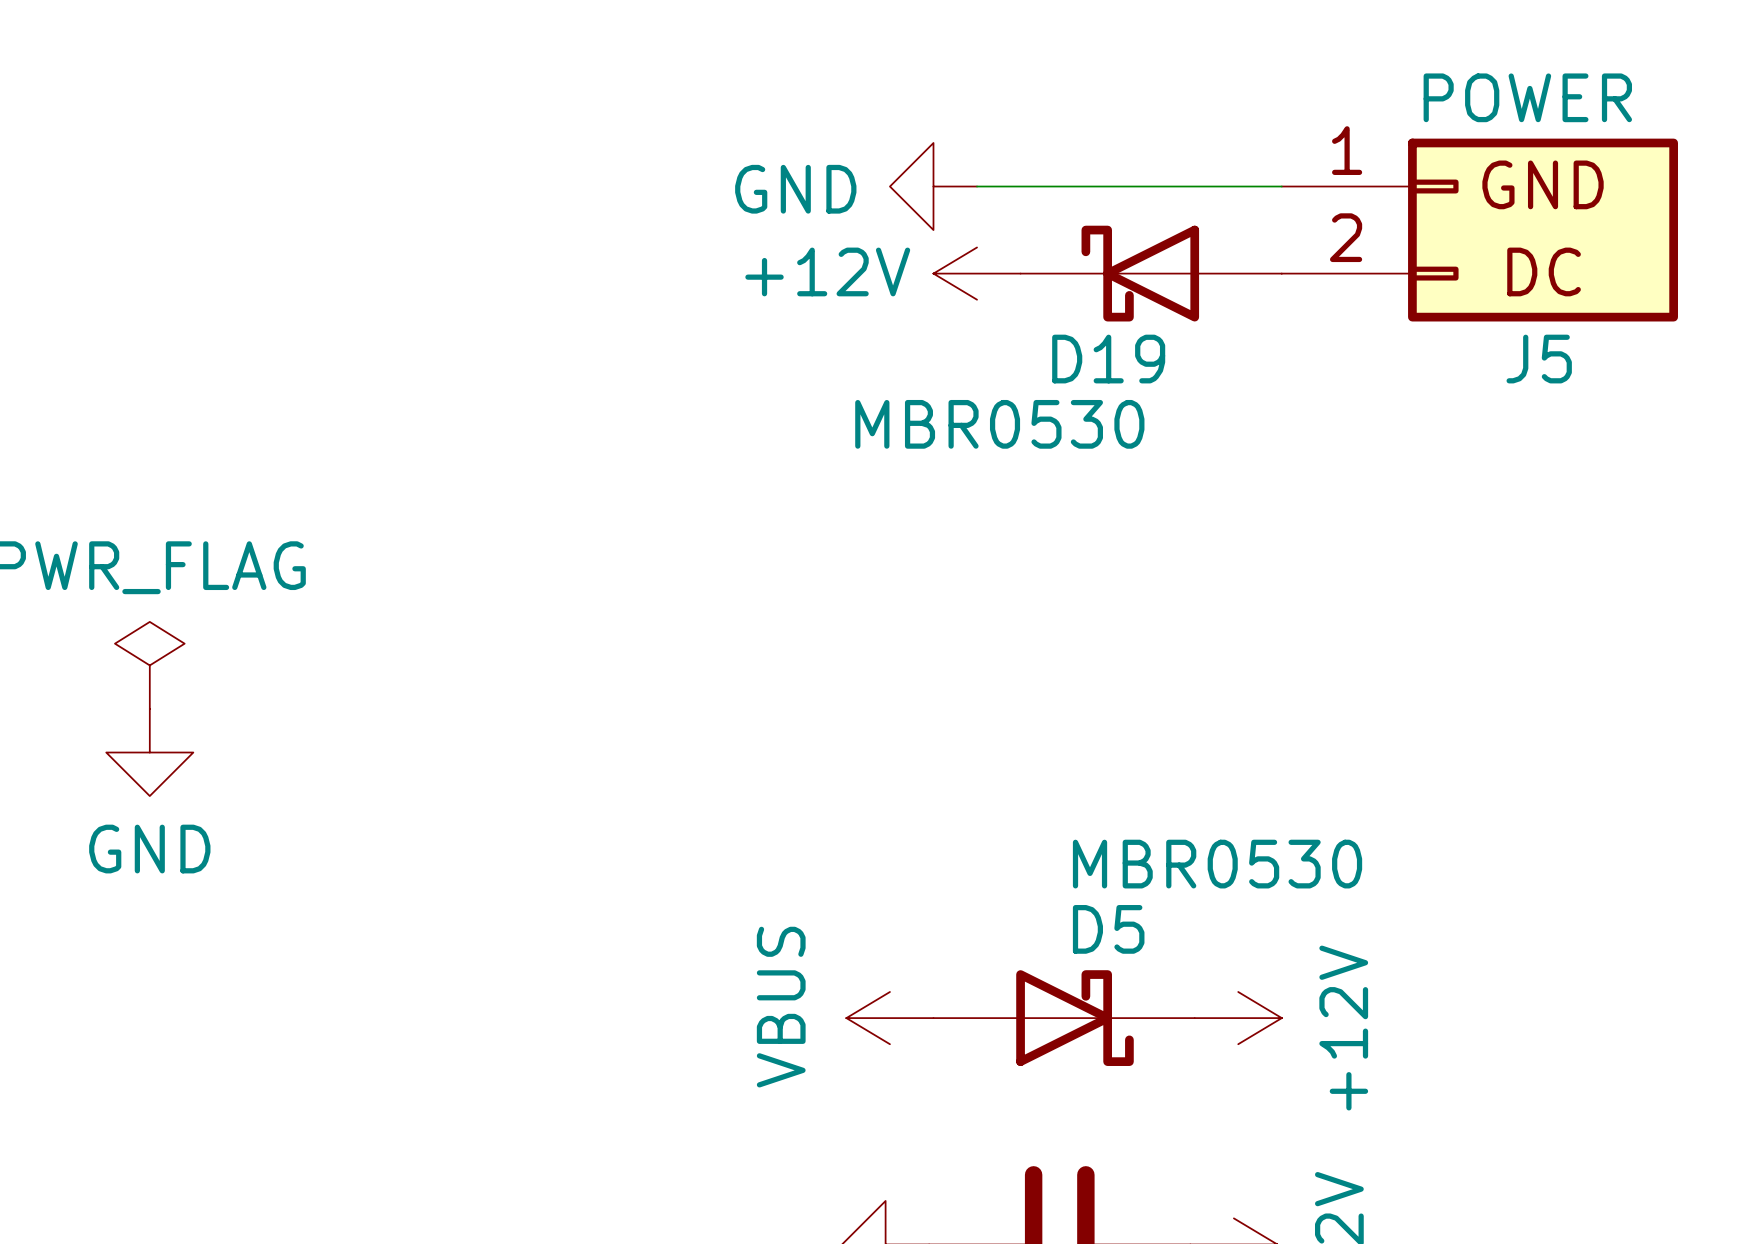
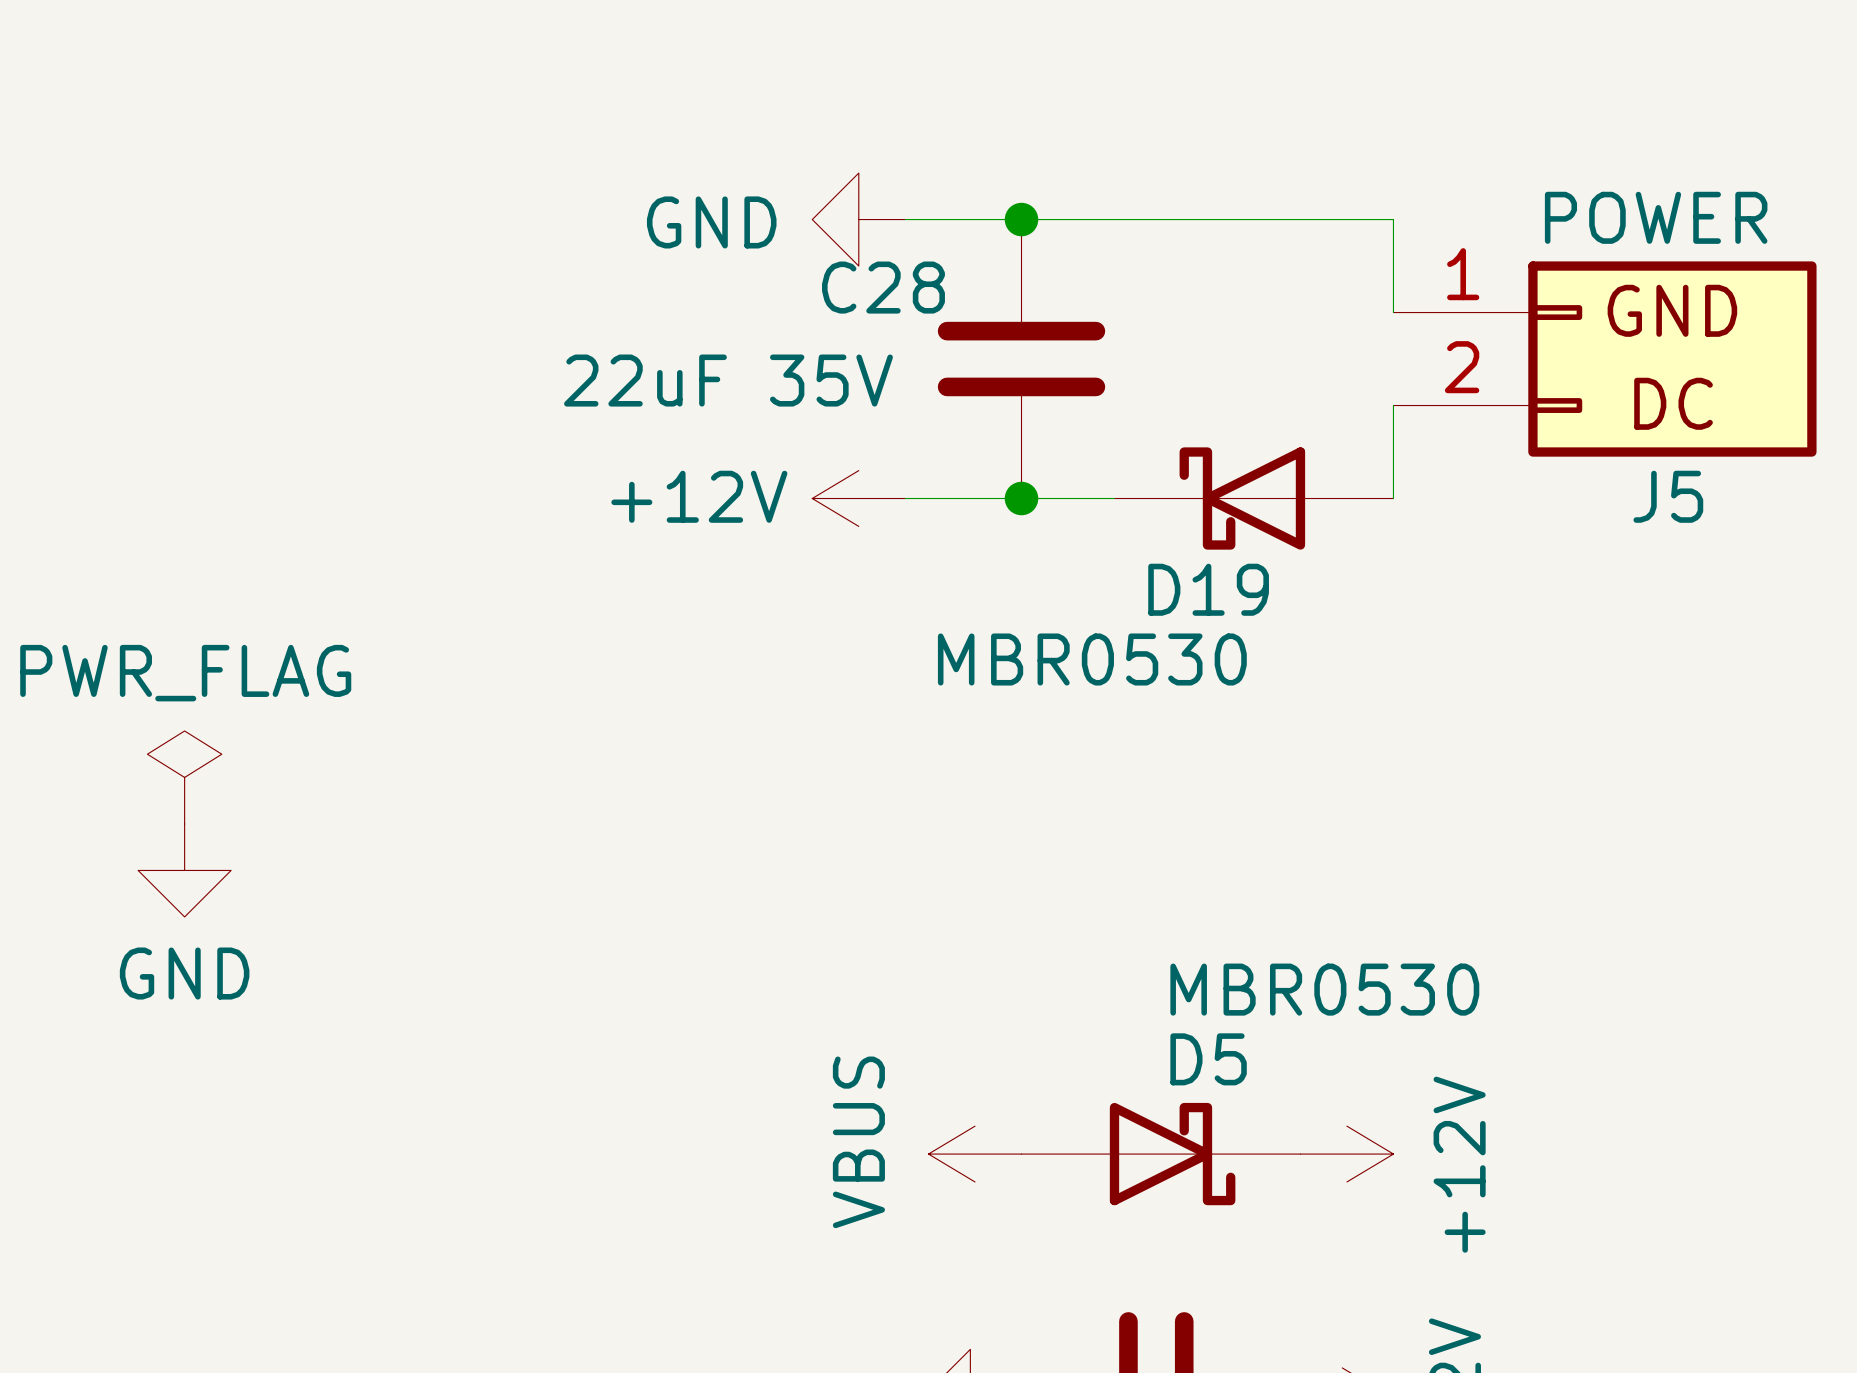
wire: none -> (905, 219) (1393, 219) (1393, 312)
junction: none -> (1021, 219)
power symbol position: GND (933, 186) -> GND (858, 219)
wire: (977, 186) (1281, 186) -> none
J5 position: (1479, 230) -> (1605, 359)
C28: none -> 22uF 35V (1021, 359)
power symbol position: +12V (977, 273) -> +12V (858, 498)
D19 position: (1151, 273) -> (1253, 498)
wire: none -> (1393, 405) (1393, 498)
wire: none -> (905, 498) (1114, 498)
junction: none -> (1021, 498)

